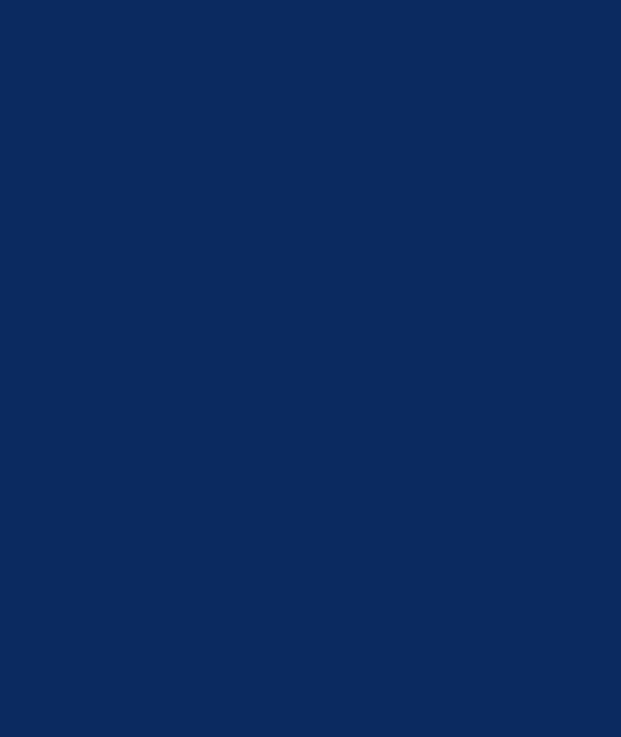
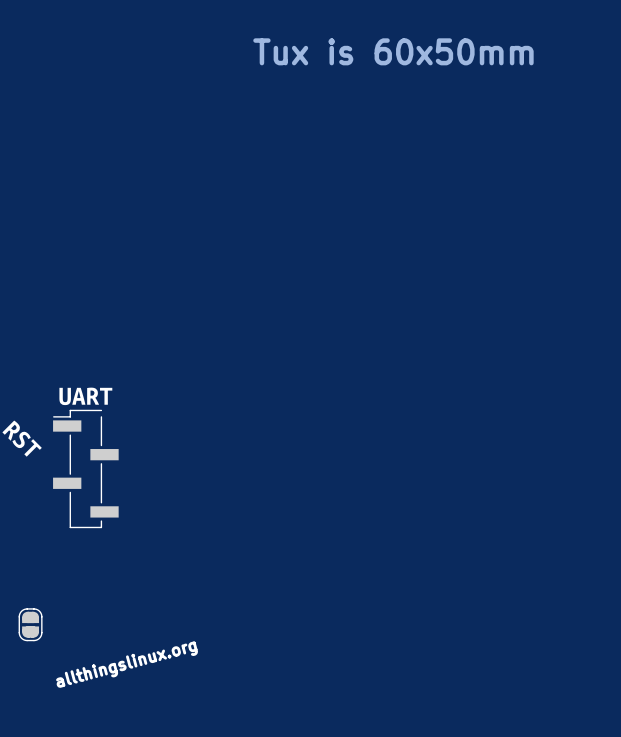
text: none -> Tux is 60x50mm (393, 51)
drawing: none -> [59, 387, 113, 406]
drawing: none -> [2, 420, 42, 457]
part: none -> (85, 468)
part: none -> (30, 624)
text: none -> allthingslinux.org (127, 664)

